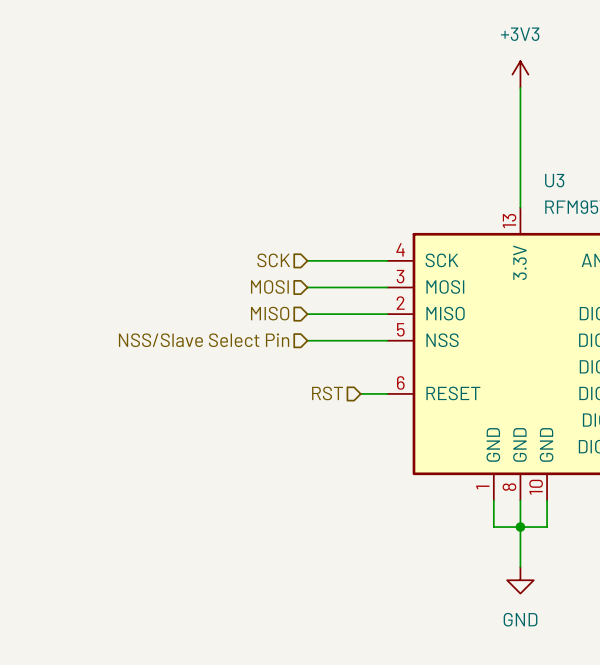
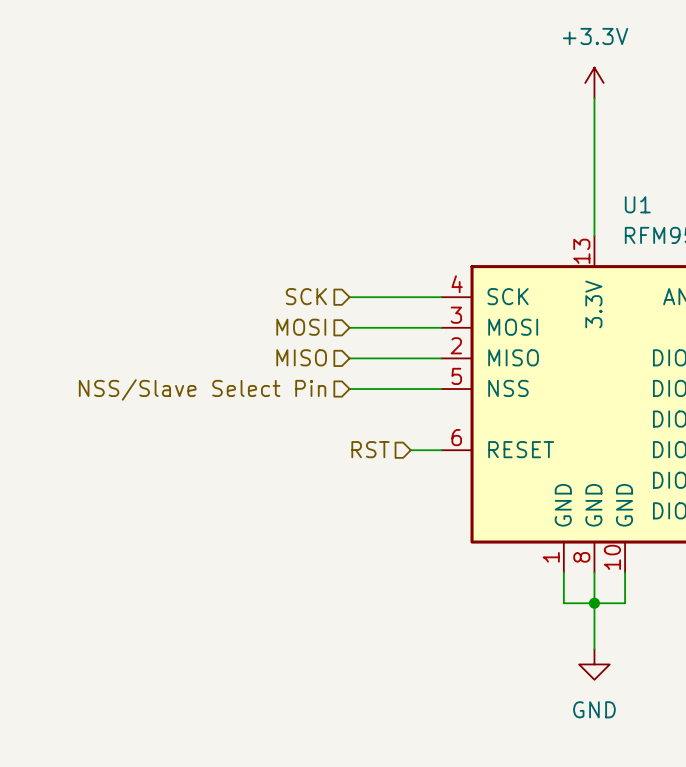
power symbol: +3V3 (520, 74) -> +3.3V (594, 82)
U3 name: U3 (554, 180) -> U1 (637, 204)

